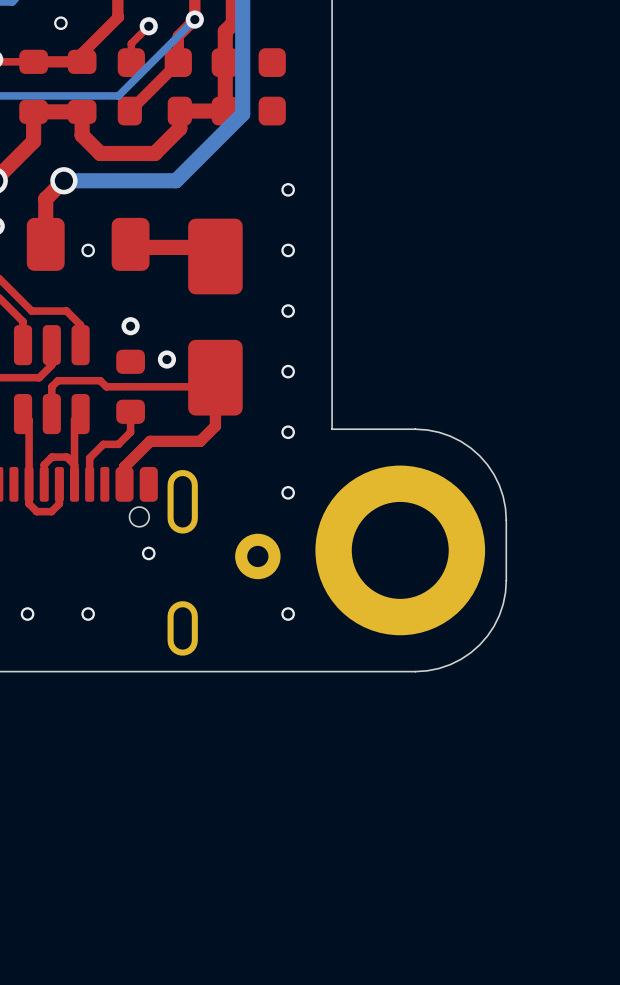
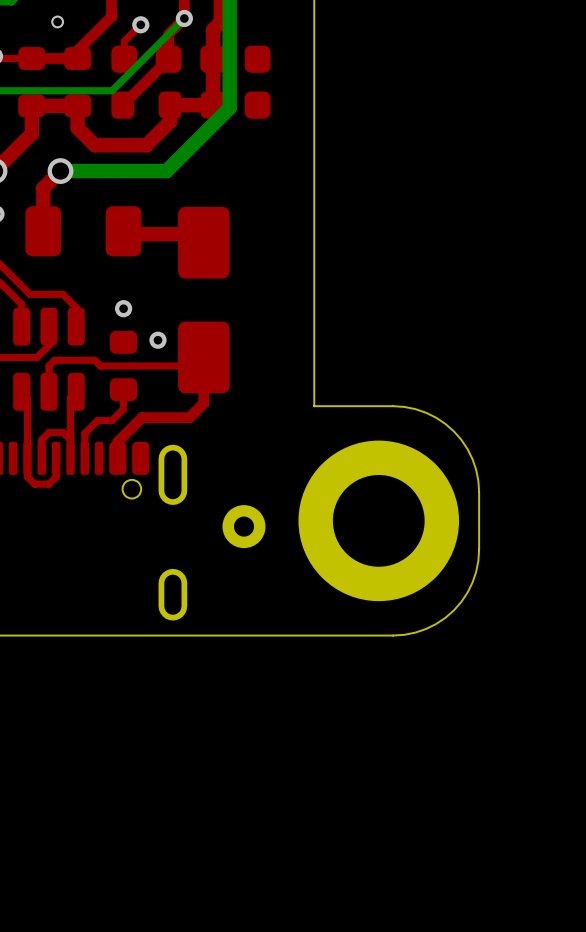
via: (288, 189) -> none
via: (88, 250) -> none
via: (288, 250) -> none
via: (288, 311) -> none
via: (288, 371) -> none
via: (288, 432) -> none
via: (288, 492) -> none
via: (148, 553) -> none
via: (27, 614) -> none
via: (88, 614) -> none
via: (288, 614) -> none

